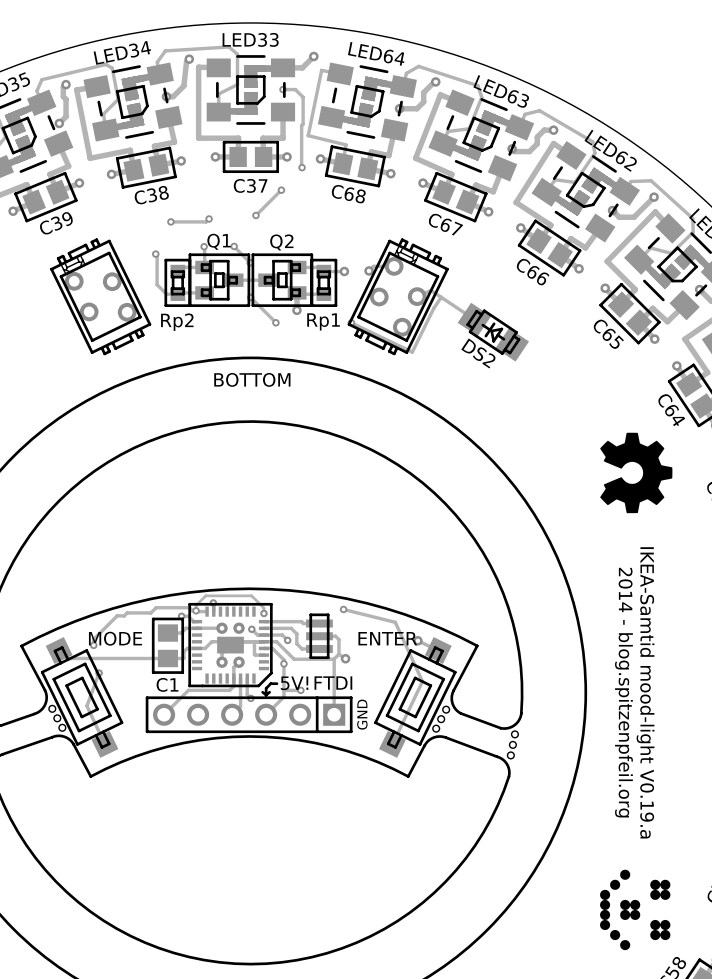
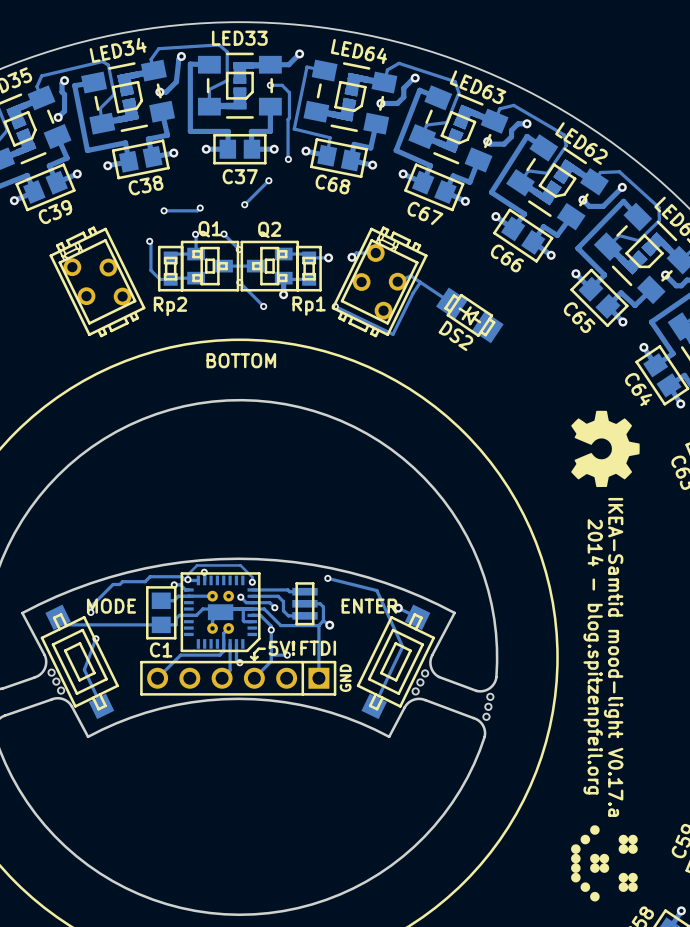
text: IKEA-Samtid mood-light V0.19.a (645, 692) -> IKEA-Samtid mood-light V0.17.a (613, 657)

